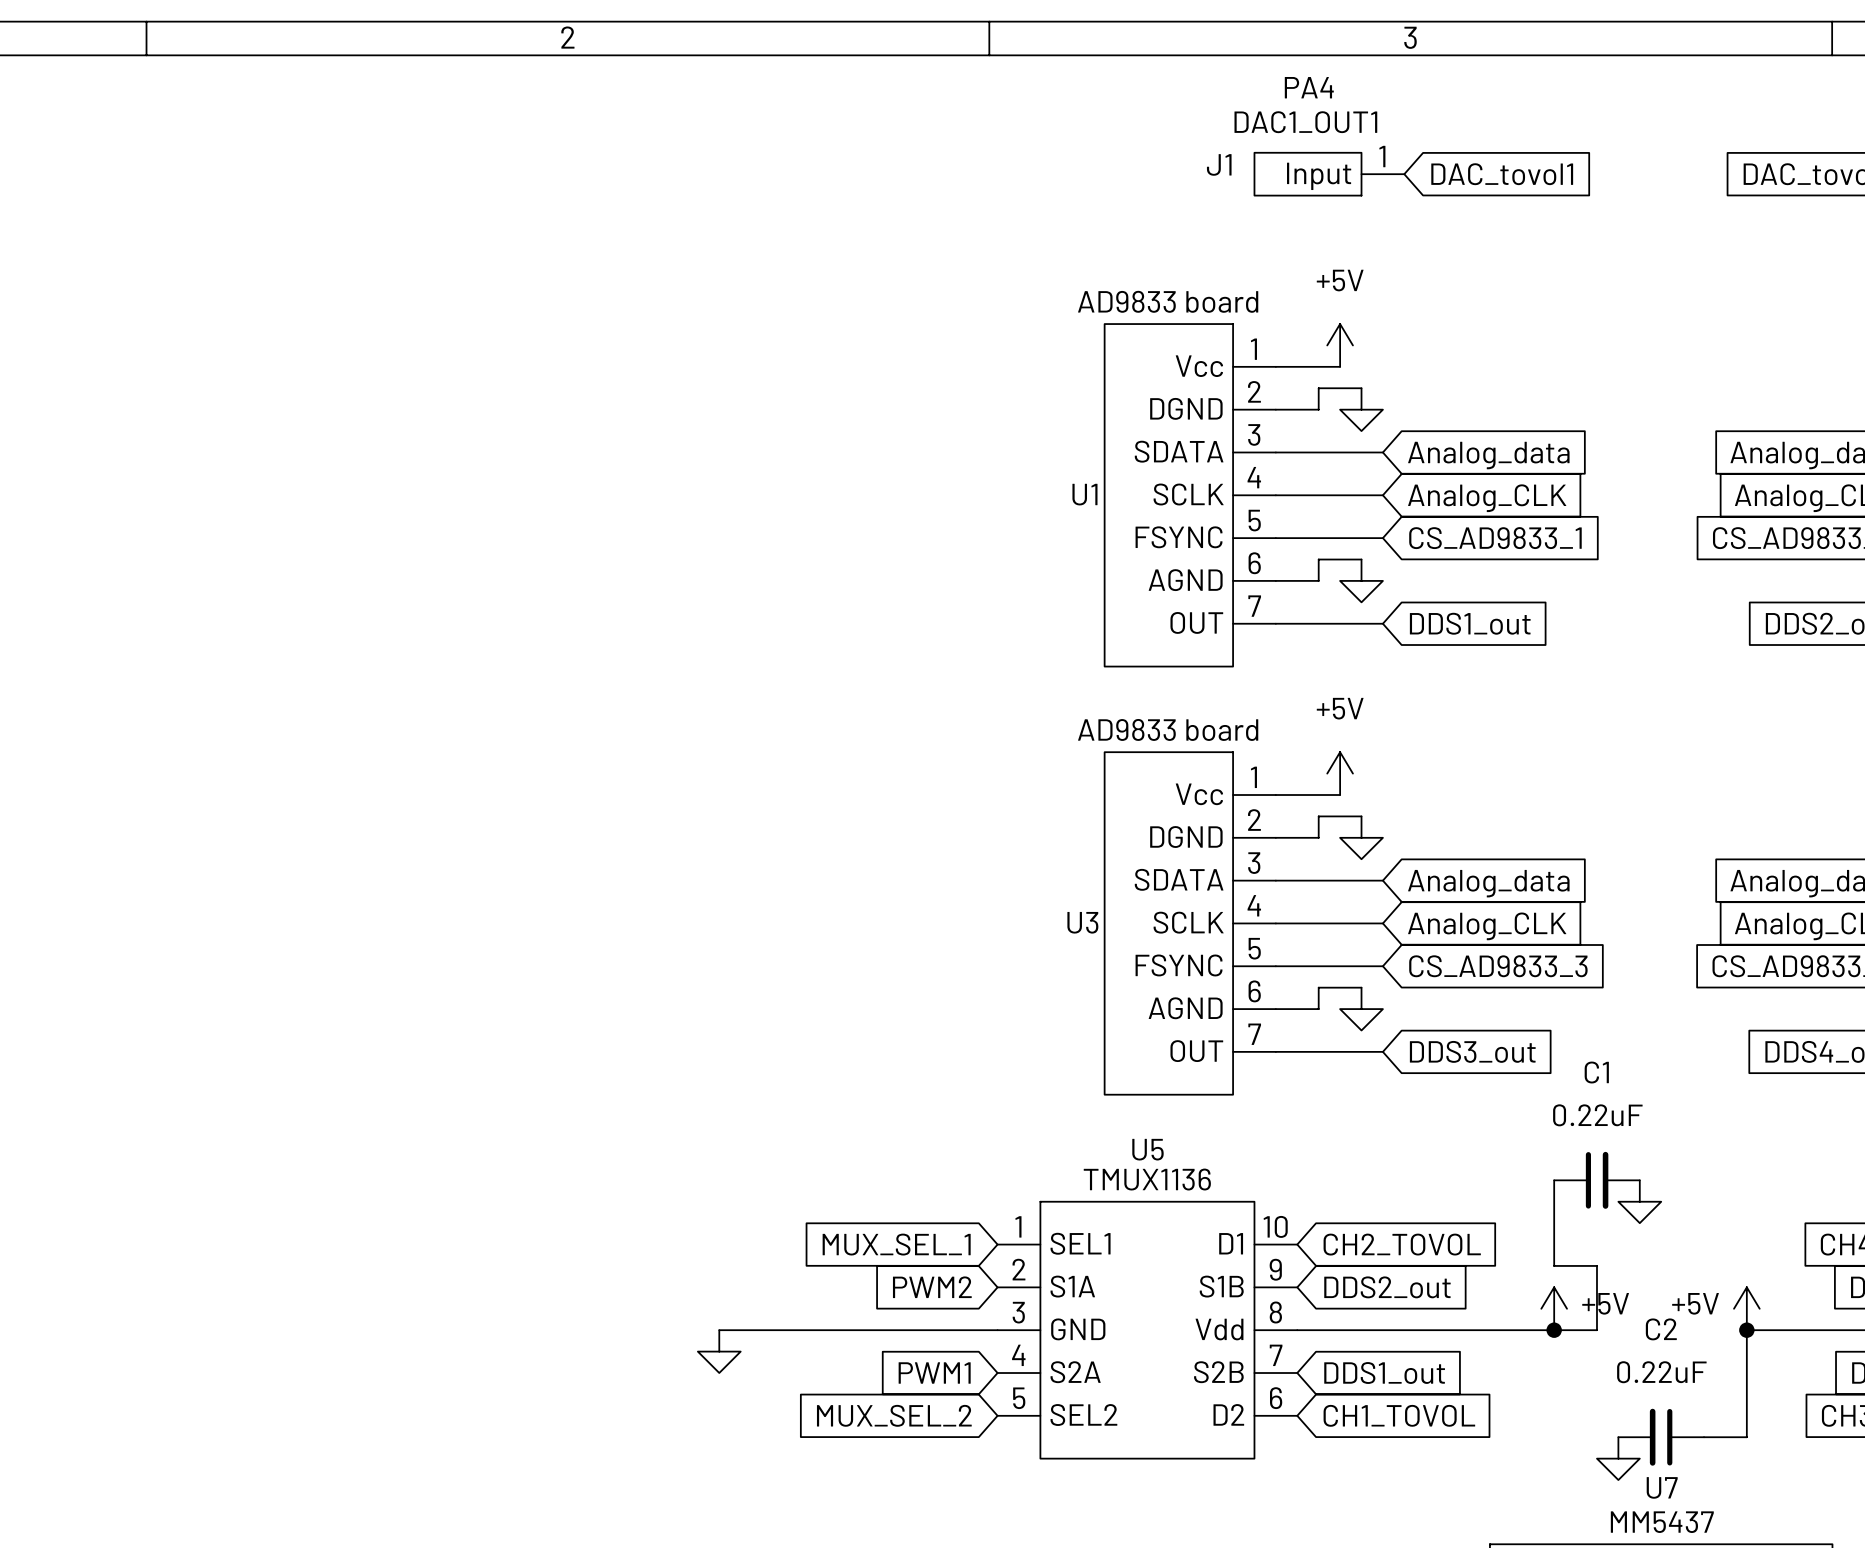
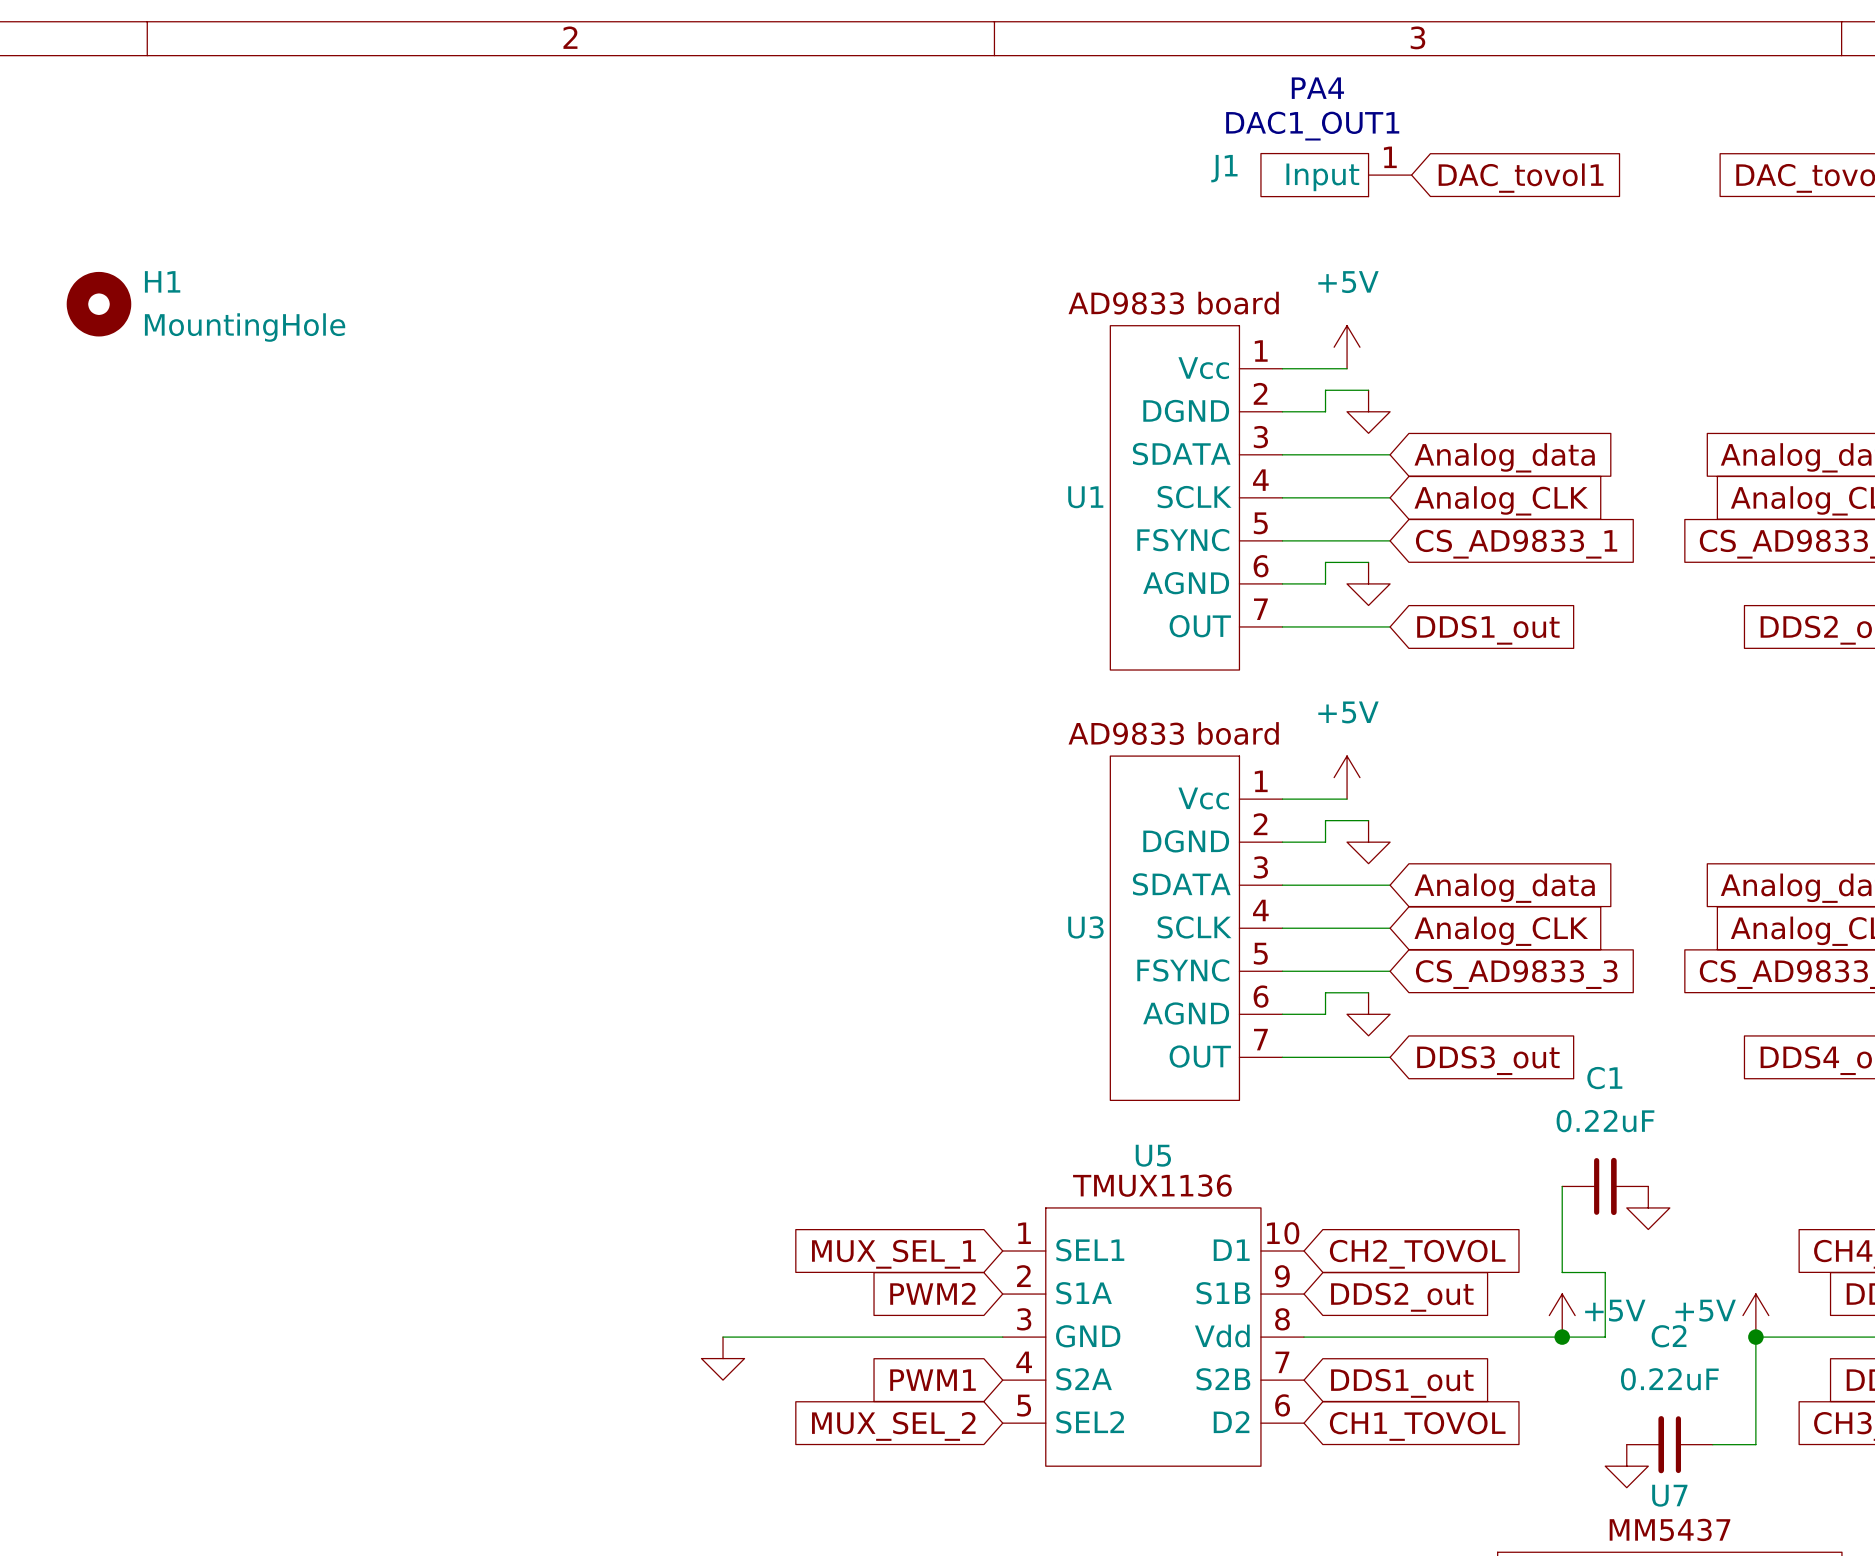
H1: none -> MountingHole (98, 304)

